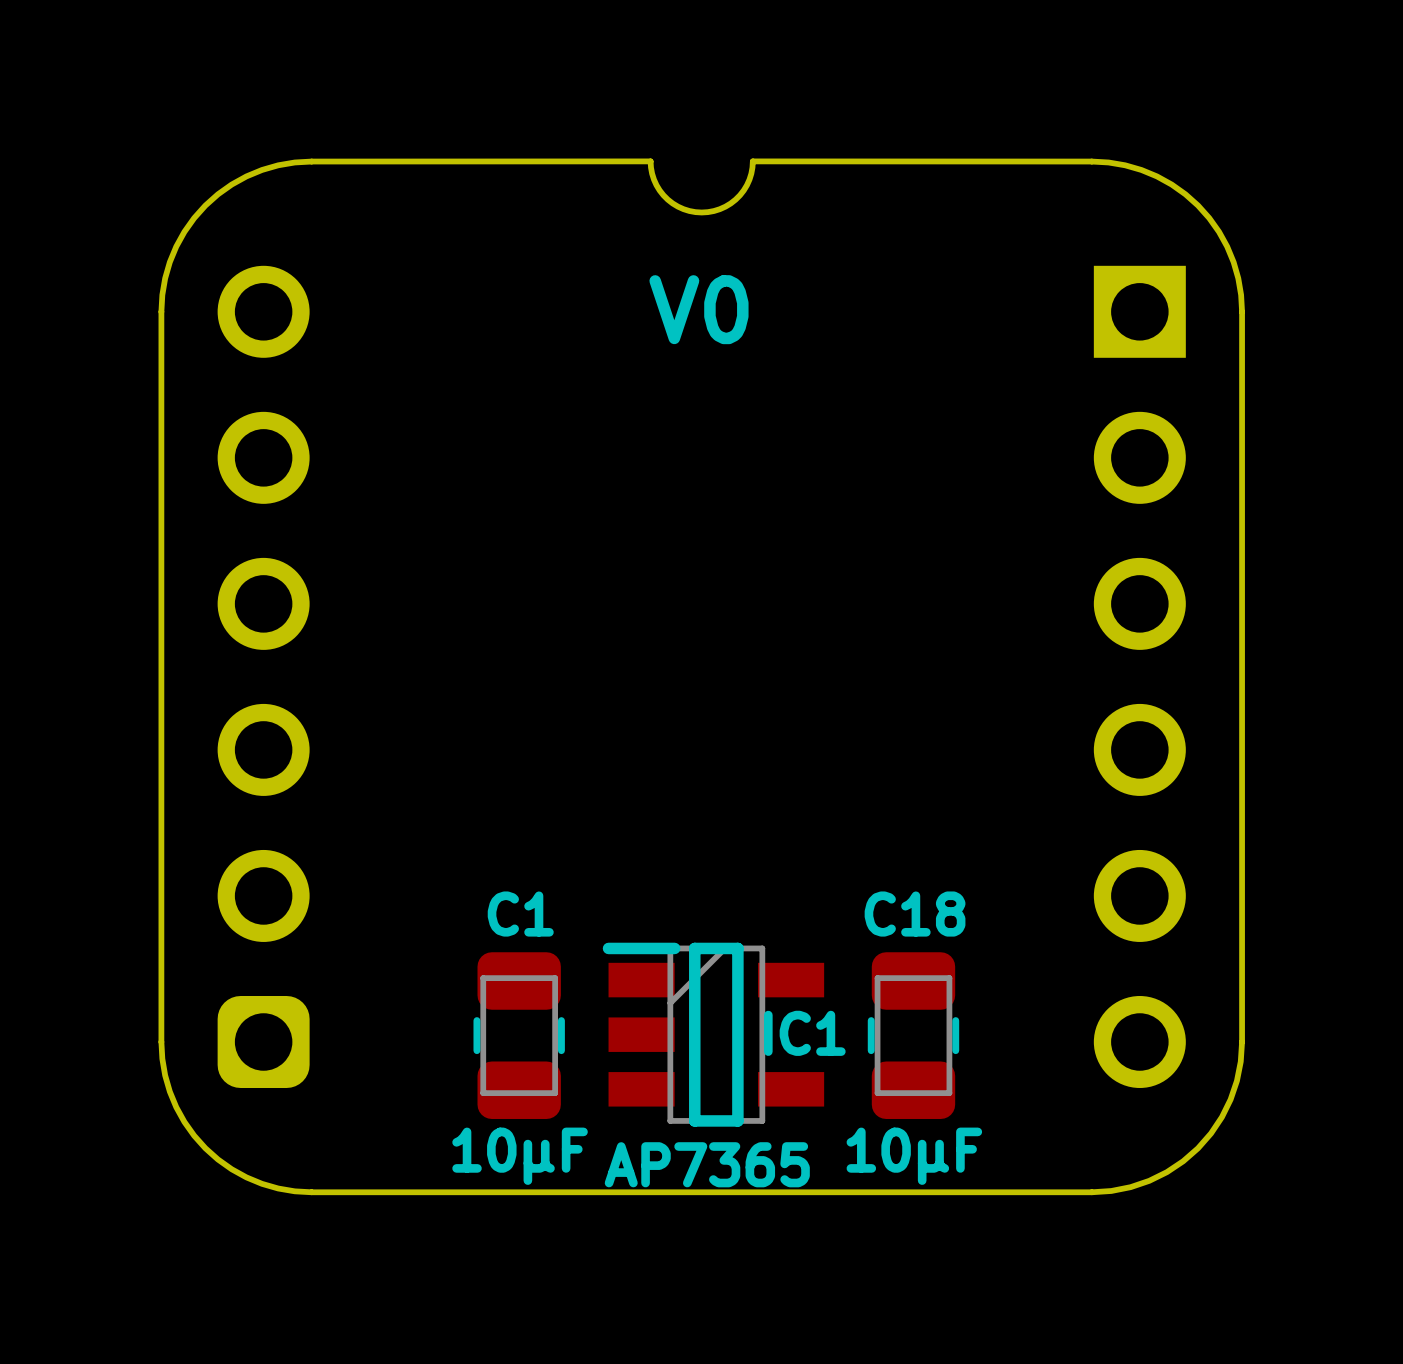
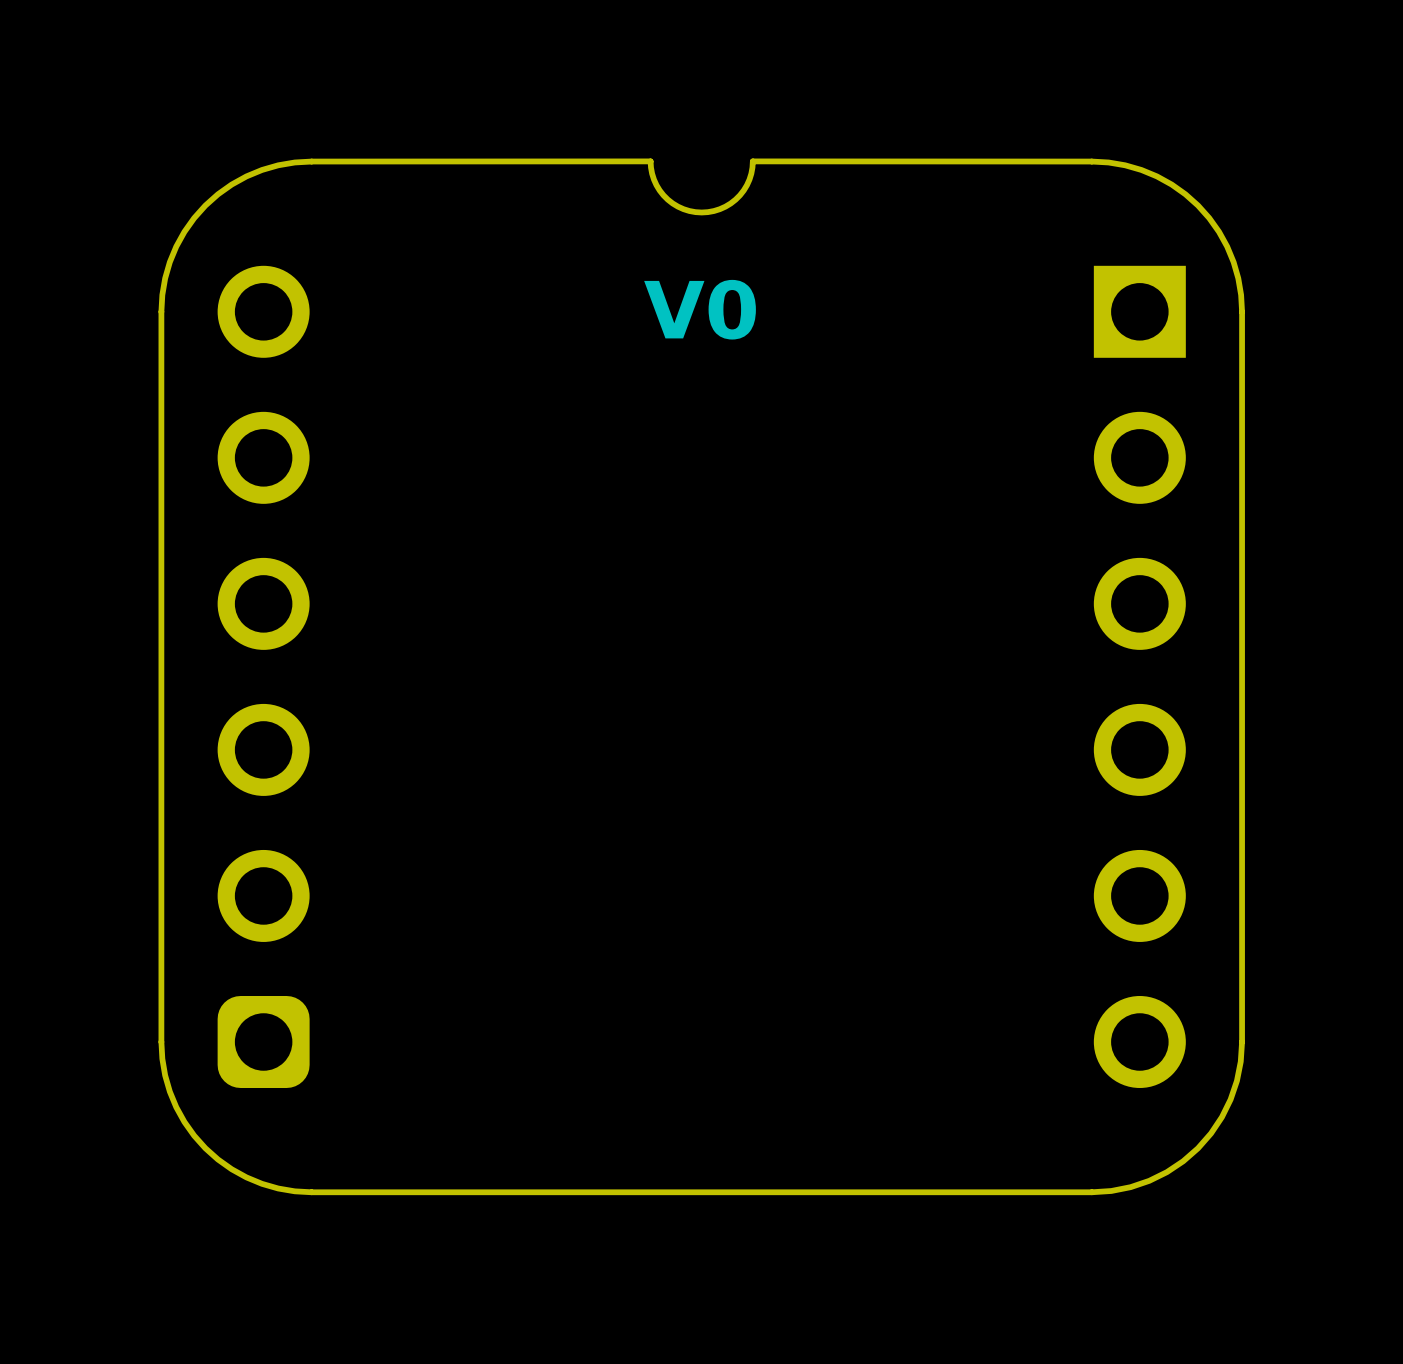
IC1: (713, 1034) -> none
C1: 10µF (519, 1035) -> none
C18: 10µF (913, 1035) -> none

